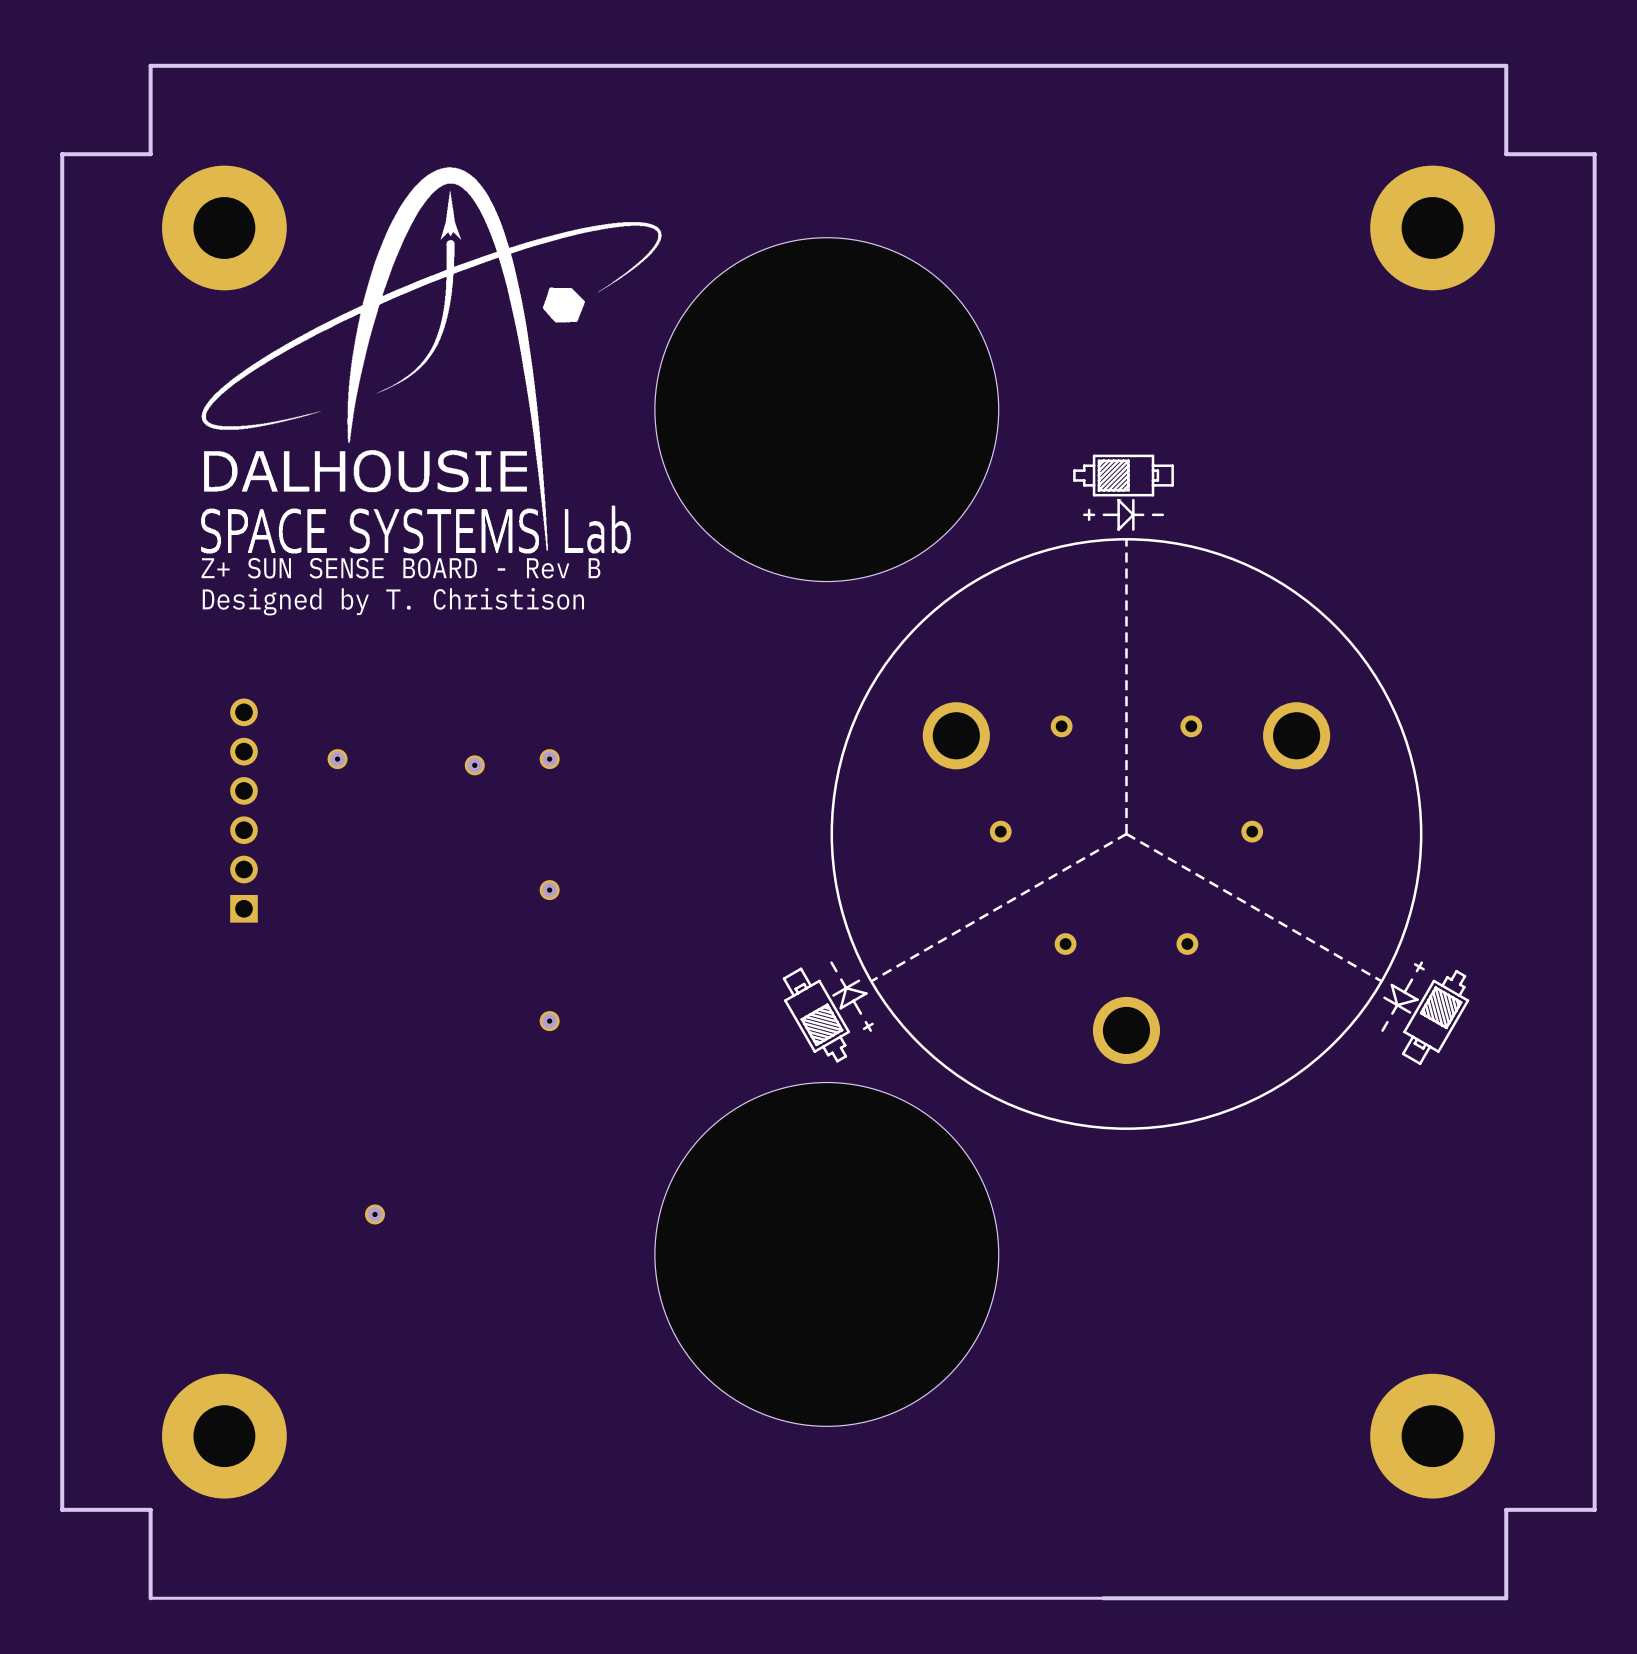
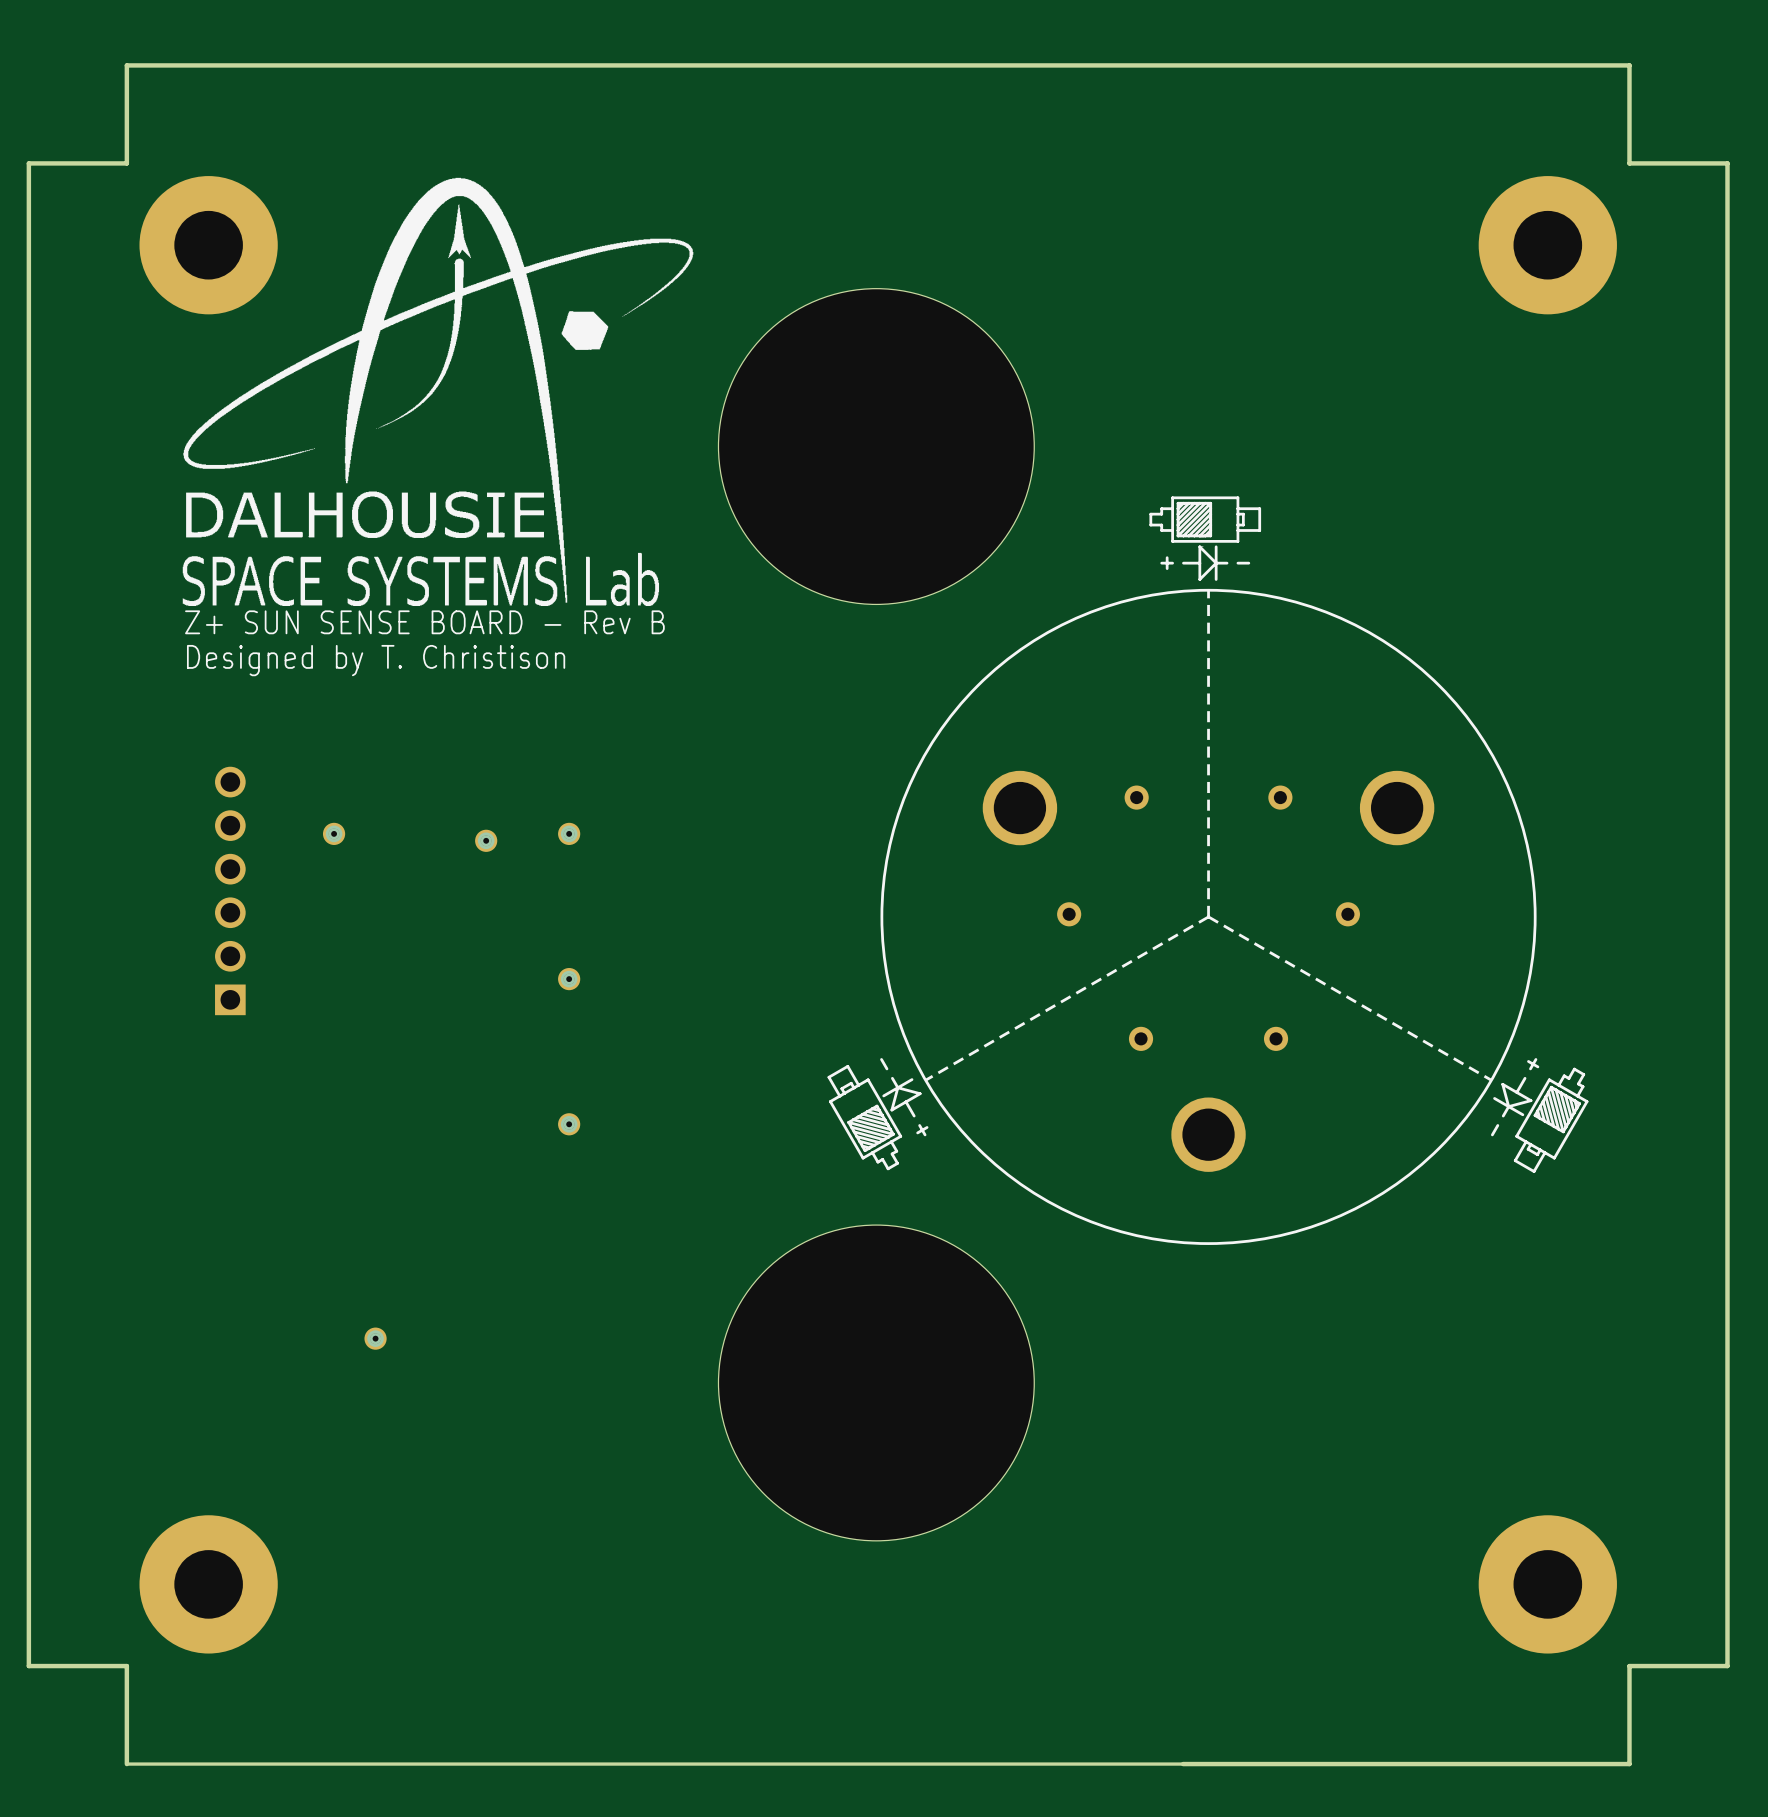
hole size: [654, 237, 999, 582] -> [718, 288, 1035, 605]
hole size: [654, 1082, 999, 1427] -> [718, 1225, 1035, 1541]

